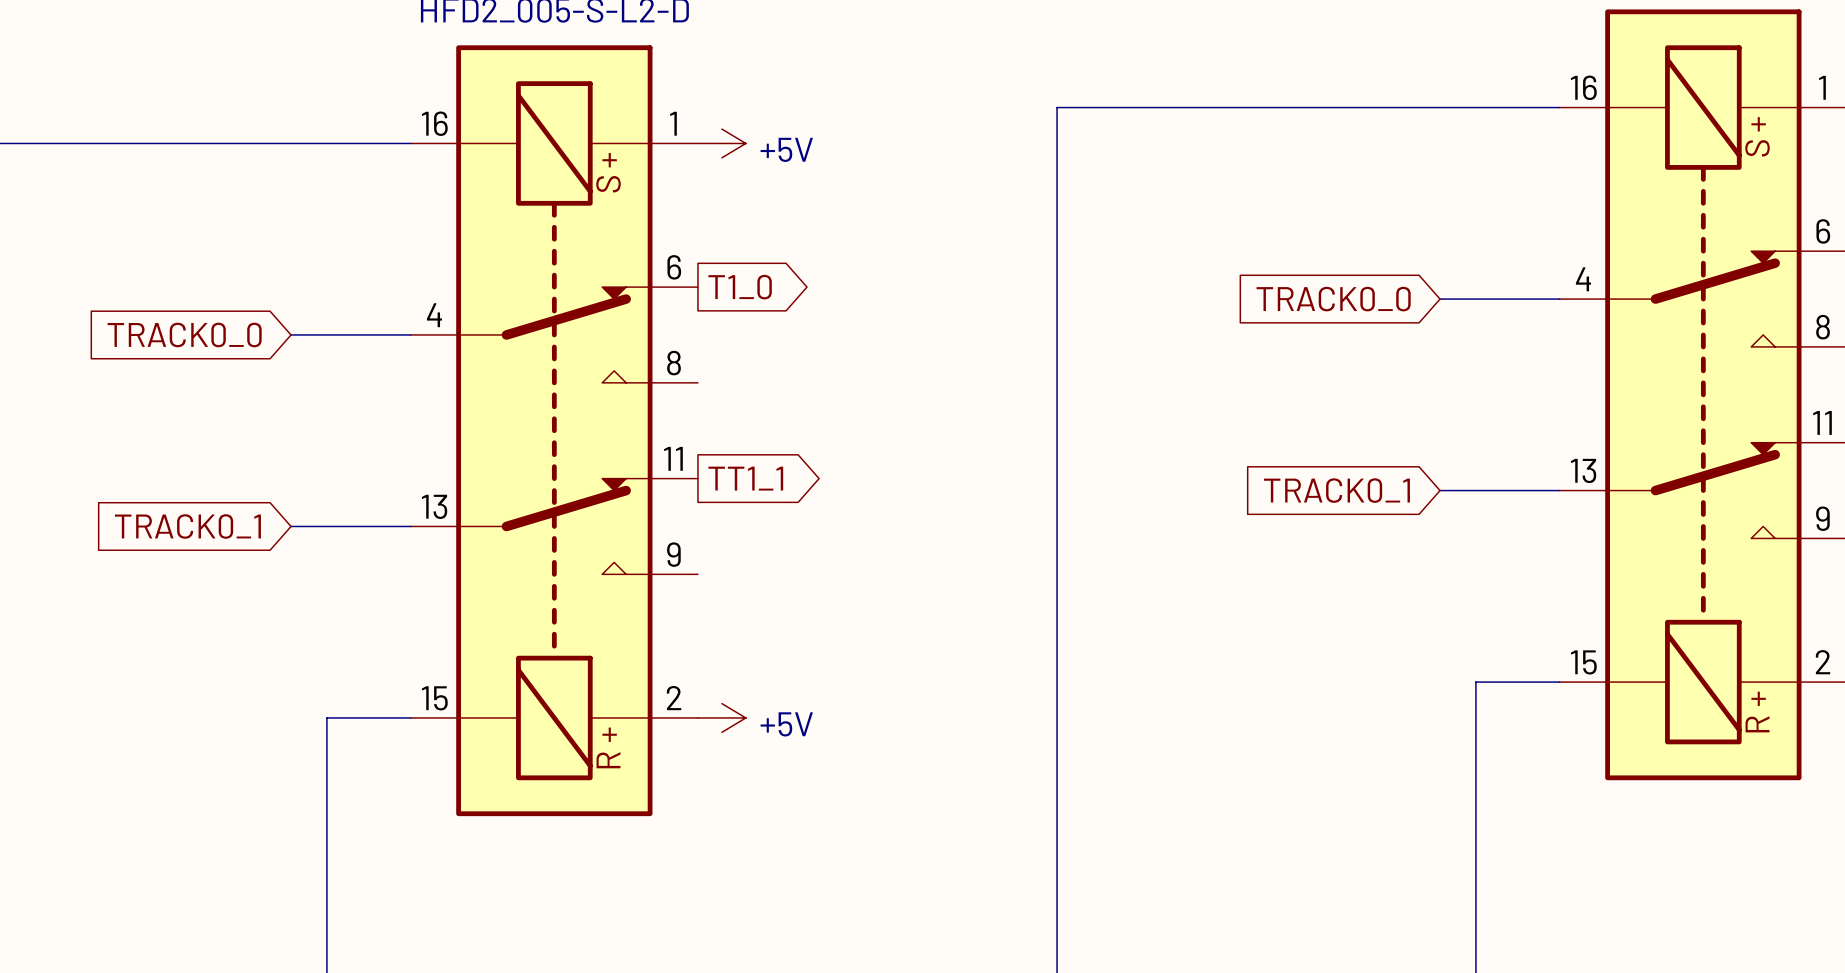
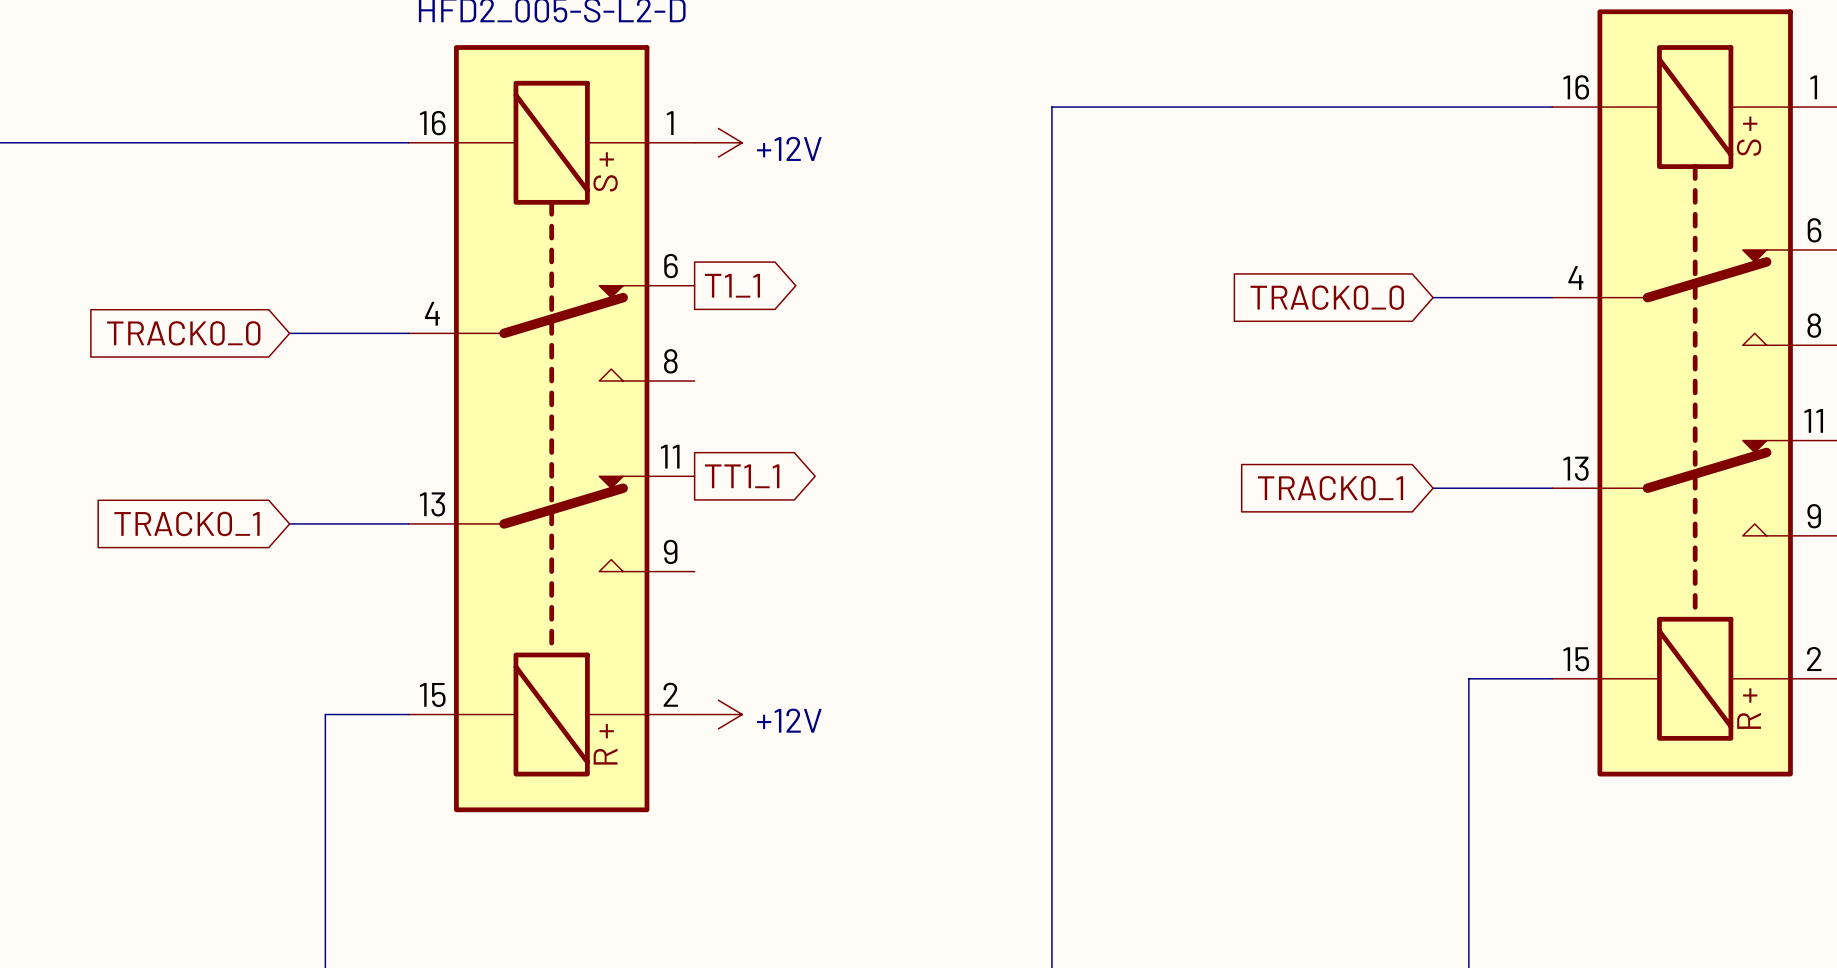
power symbol: +5V (721, 143) -> +12V (718, 142)
global label: T1_0 (740, 287) -> T1_1 (732, 285)
power symbol: +5V (721, 717) -> +12V (718, 714)

